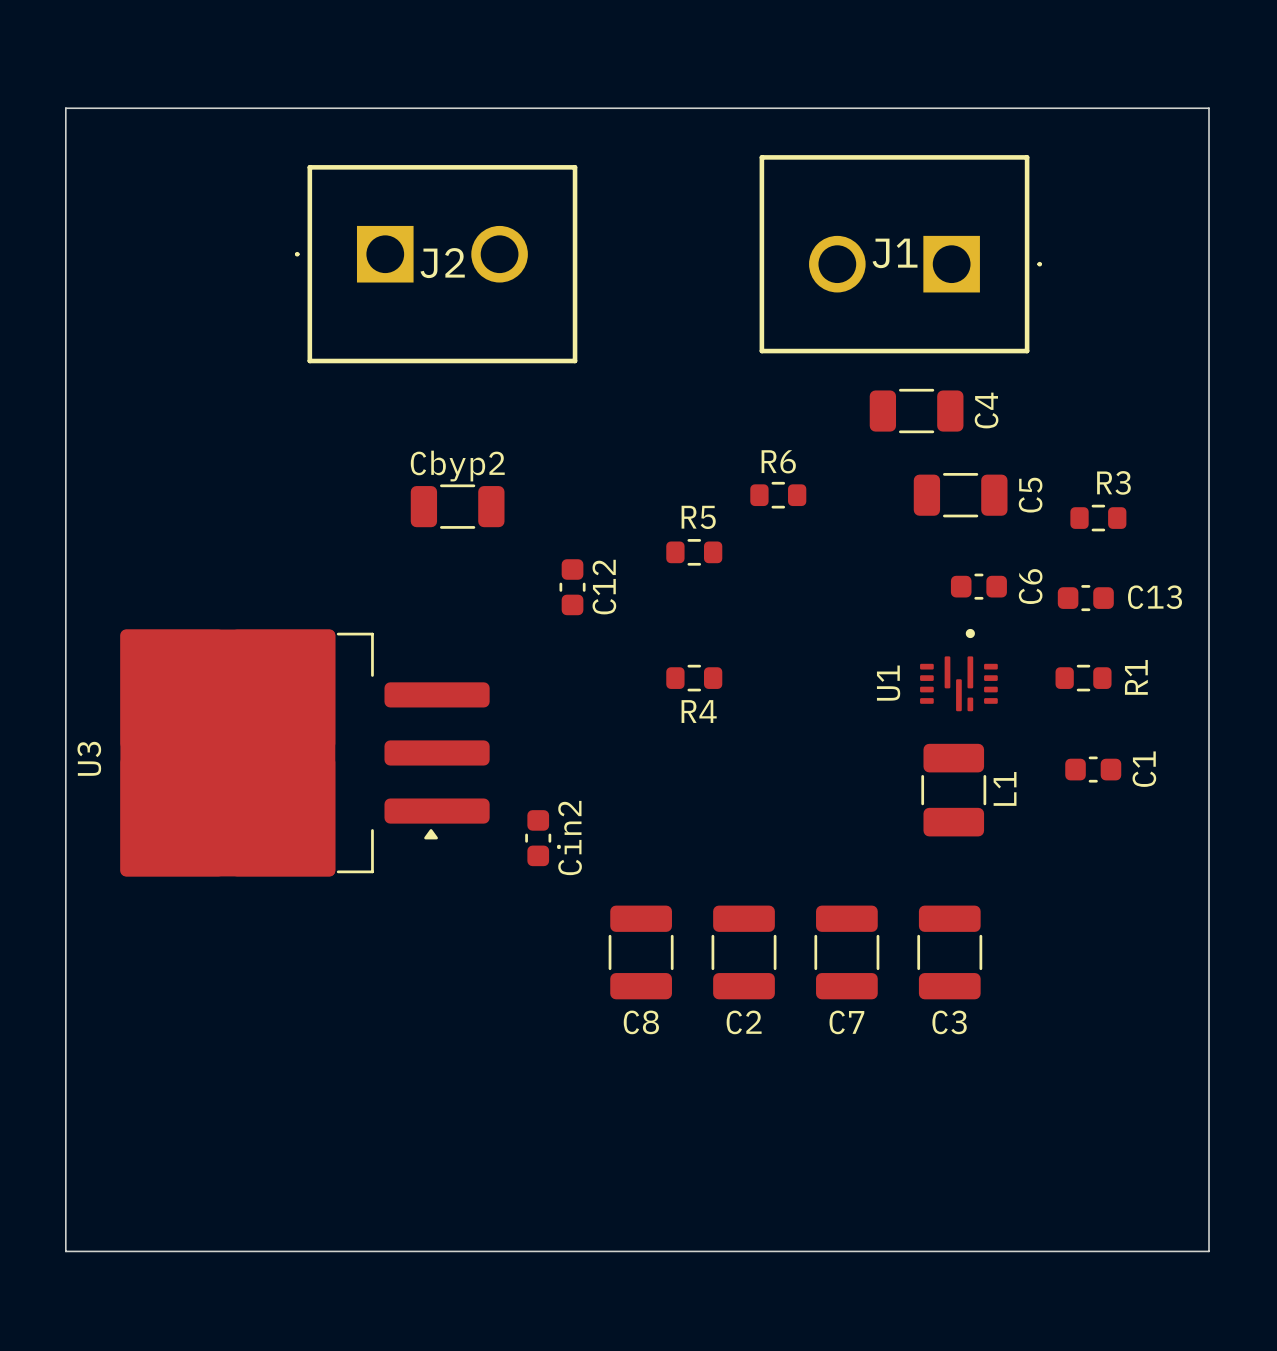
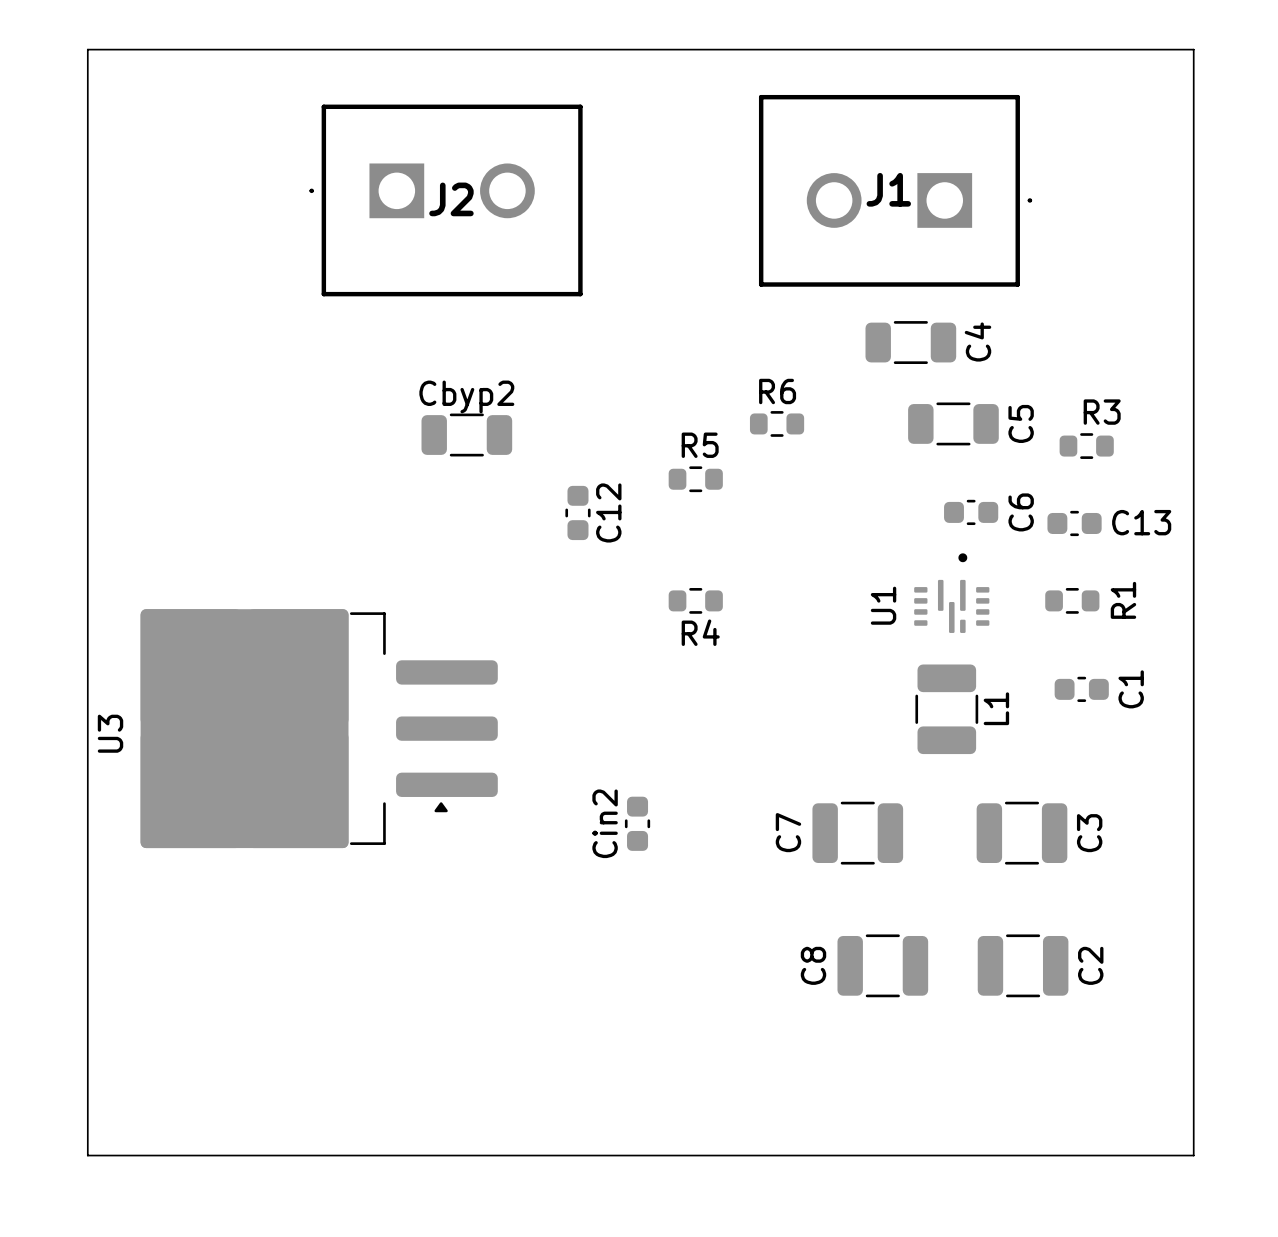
U3 position: (305, 752) -> (319, 728)
Cin2 position: (538, 838) -> (637, 823)
Cin2 name position: Cin2 (569, 838) -> Cin2 (605, 823)
C8 rotation: 0° (641, 952) -> 90° clockwise (882, 965)
C8 position: (641, 952) -> (882, 965)
C2 rotation: 0° (744, 952) -> 90° clockwise (1023, 965)
C2 position: (744, 952) -> (1023, 965)
C7 rotation: 0° (846, 952) -> 90° clockwise (857, 833)
C3 rotation: 0° (949, 952) -> 90° clockwise (1021, 833)
C3 position: (949, 952) -> (1021, 833)
C2 name position: C2 (744, 1022) -> C2 (1090, 965)
C3 name position: C3 (949, 1022) -> C3 (1089, 833)

